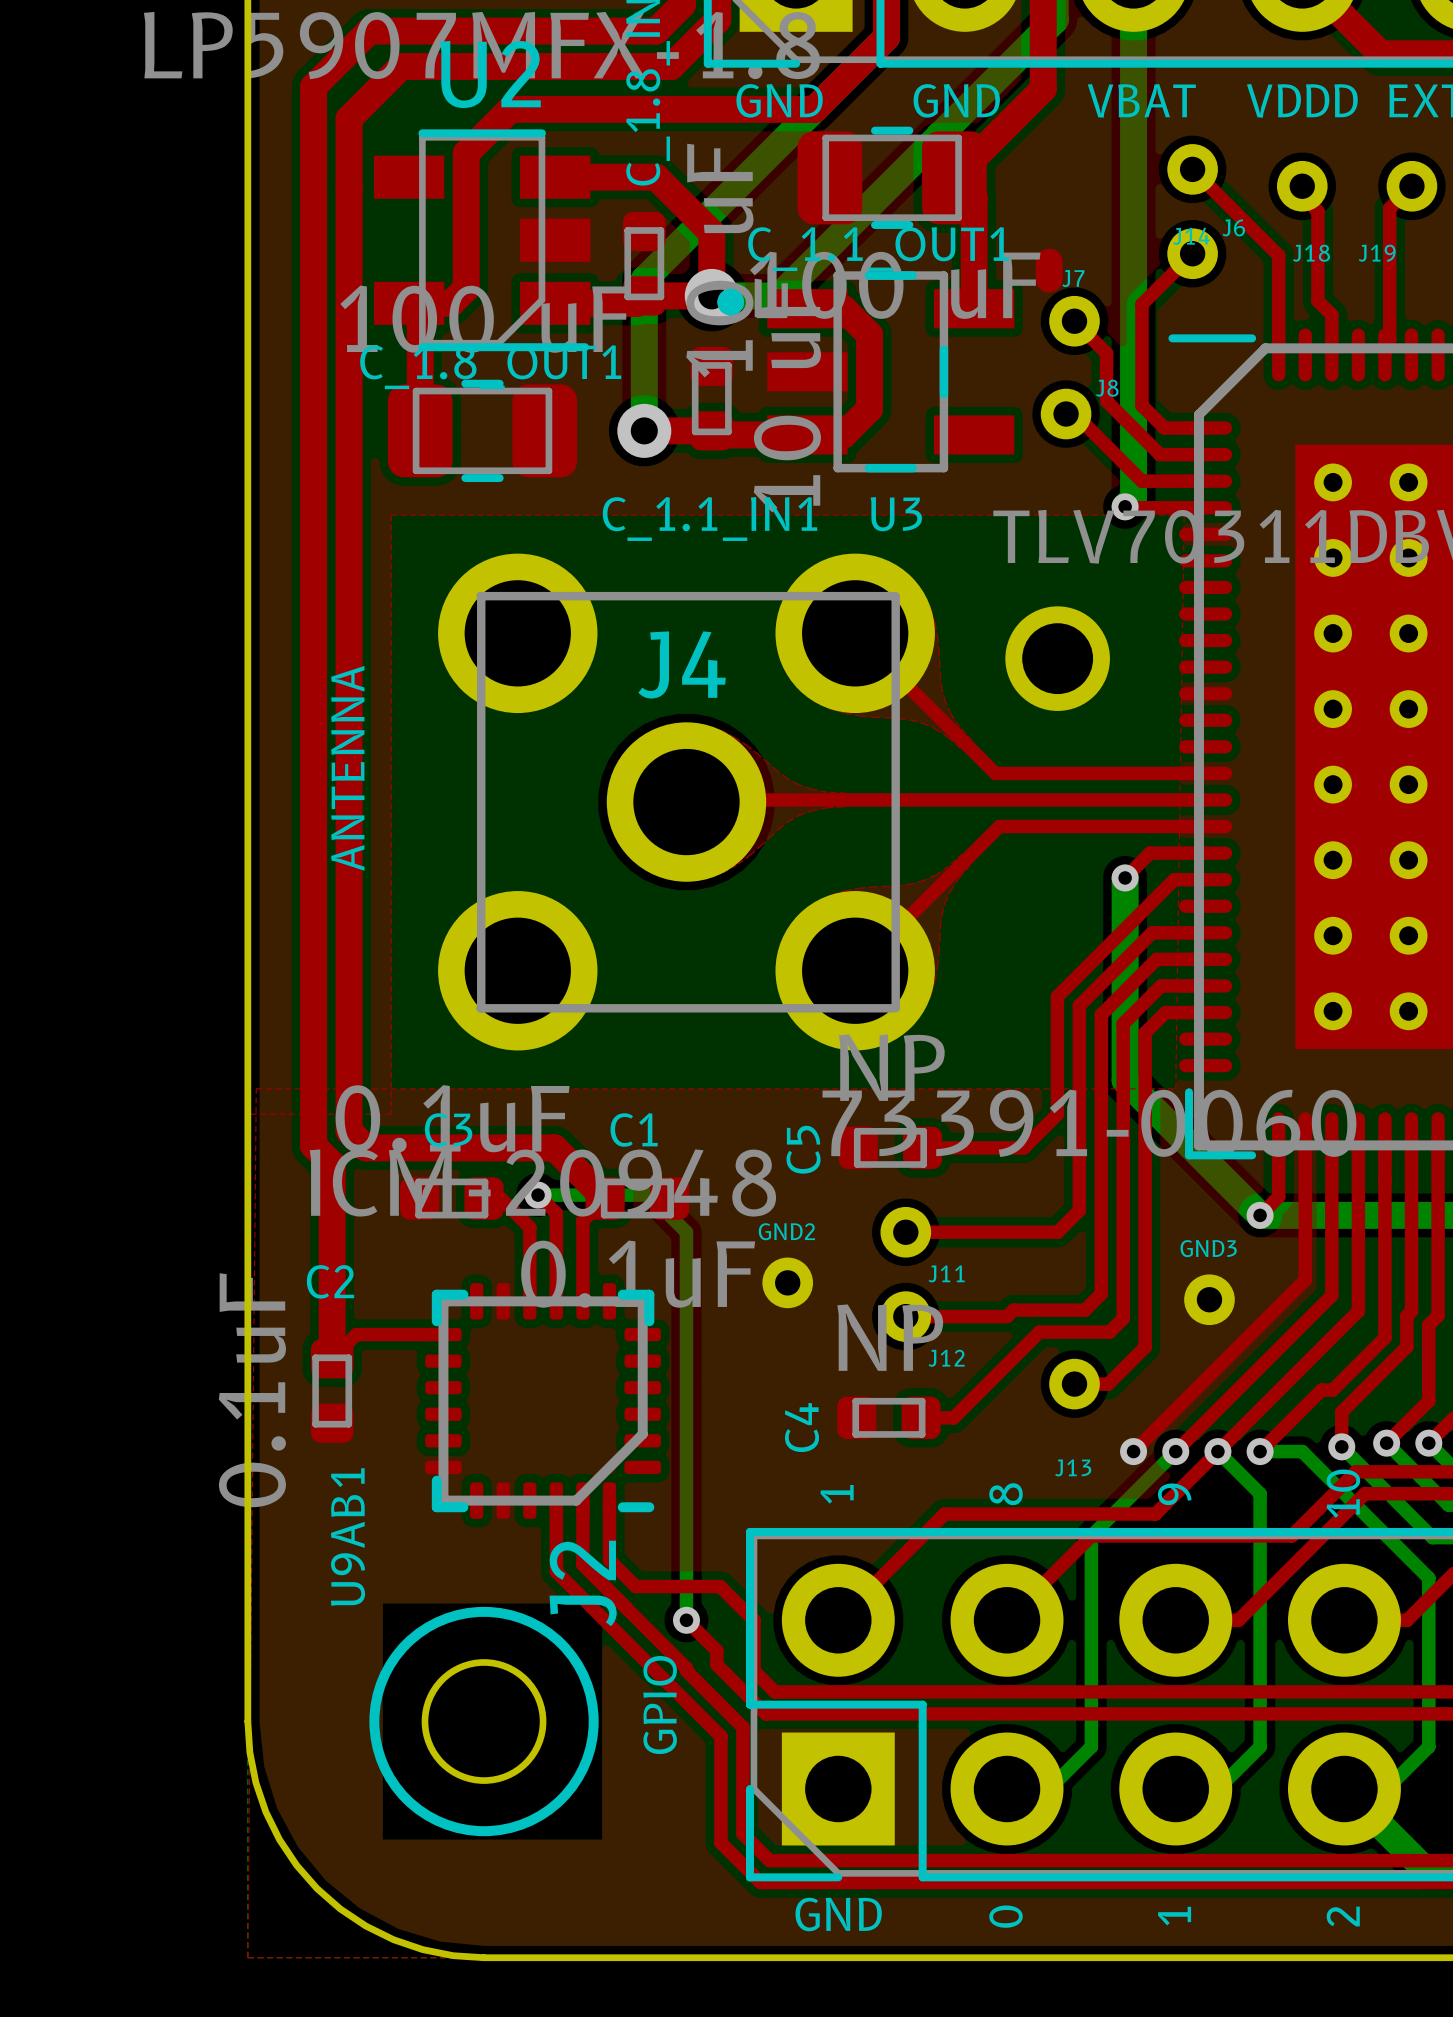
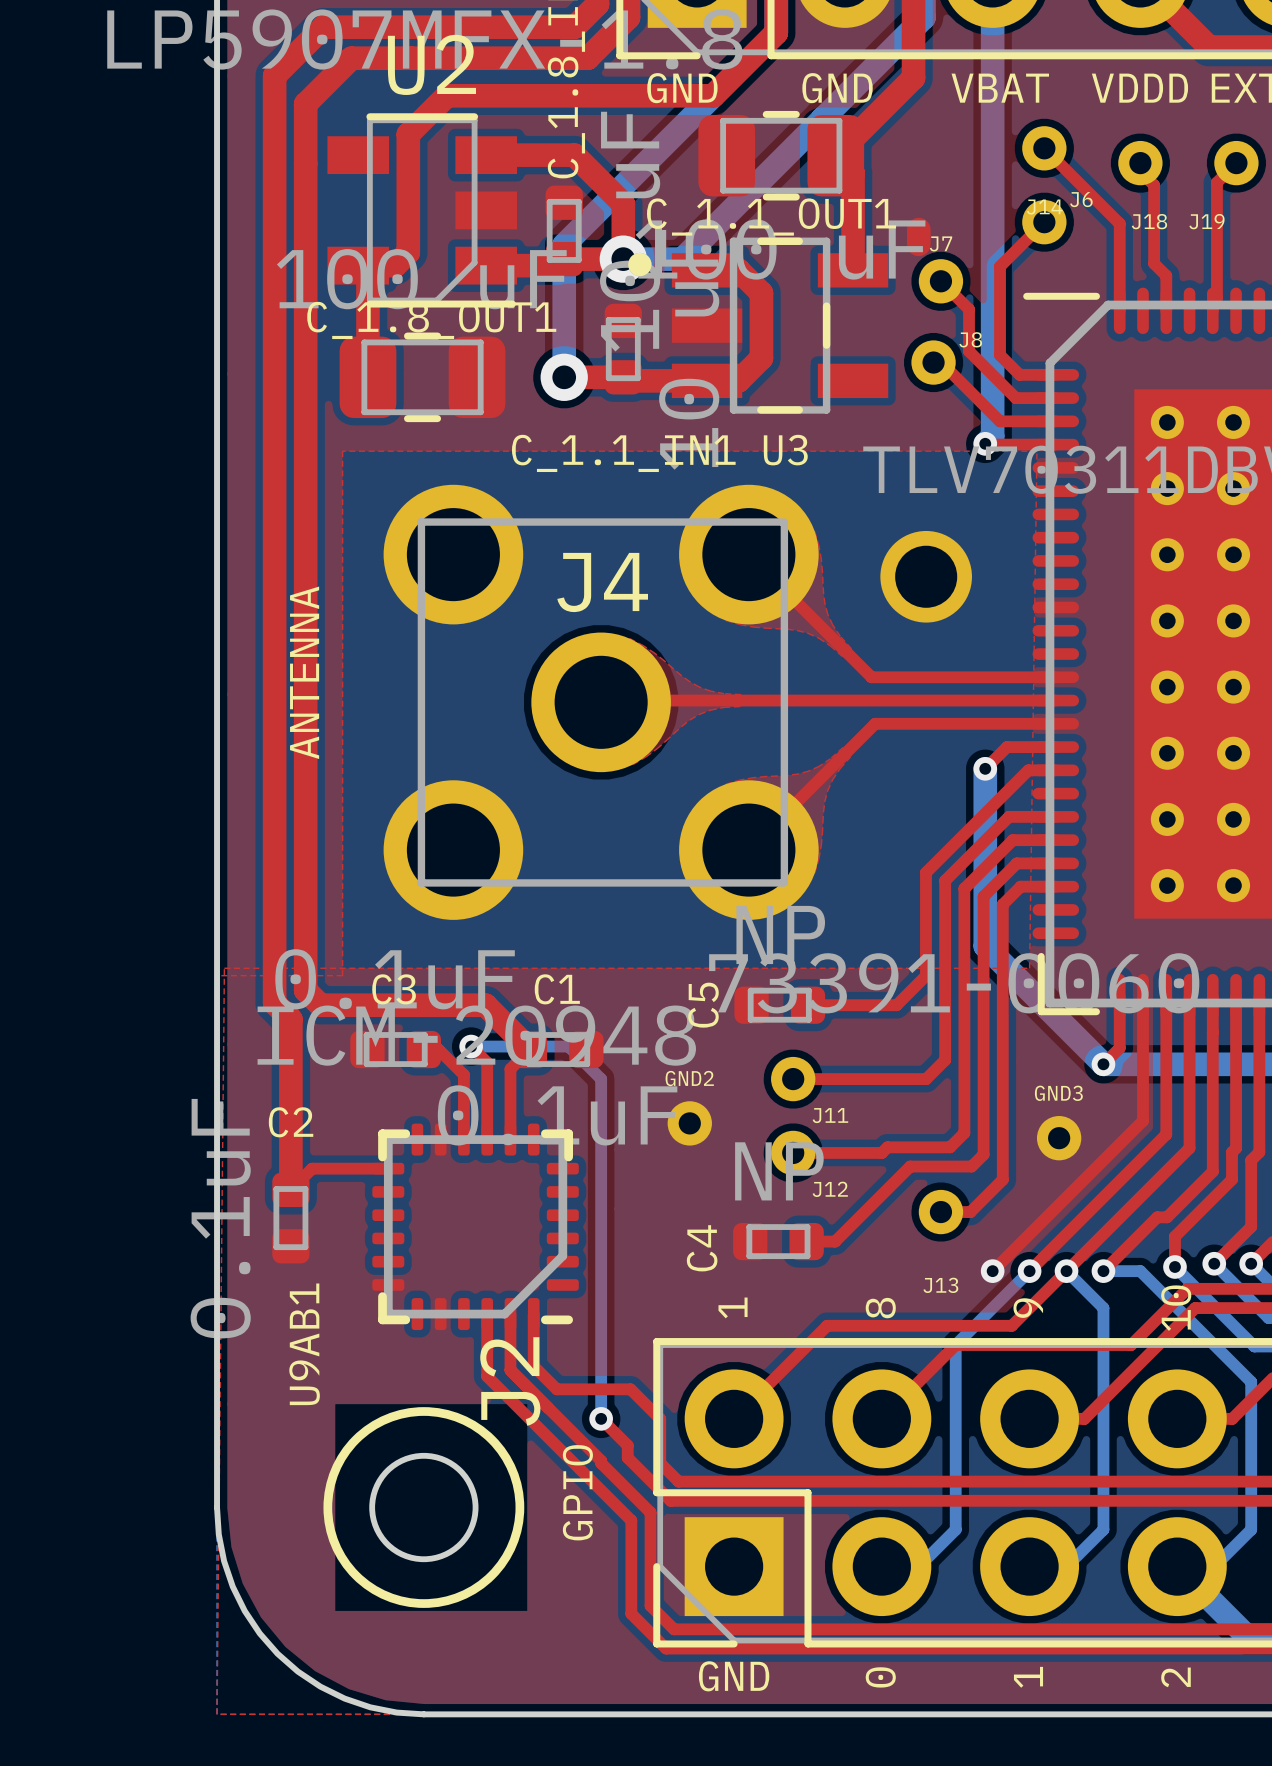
top zone outline: (1184, 515) (1175, 1088) (256, 1088) (247, 1957) -> (1036, 451) (1029, 968) (224, 968) (217, 1714)

